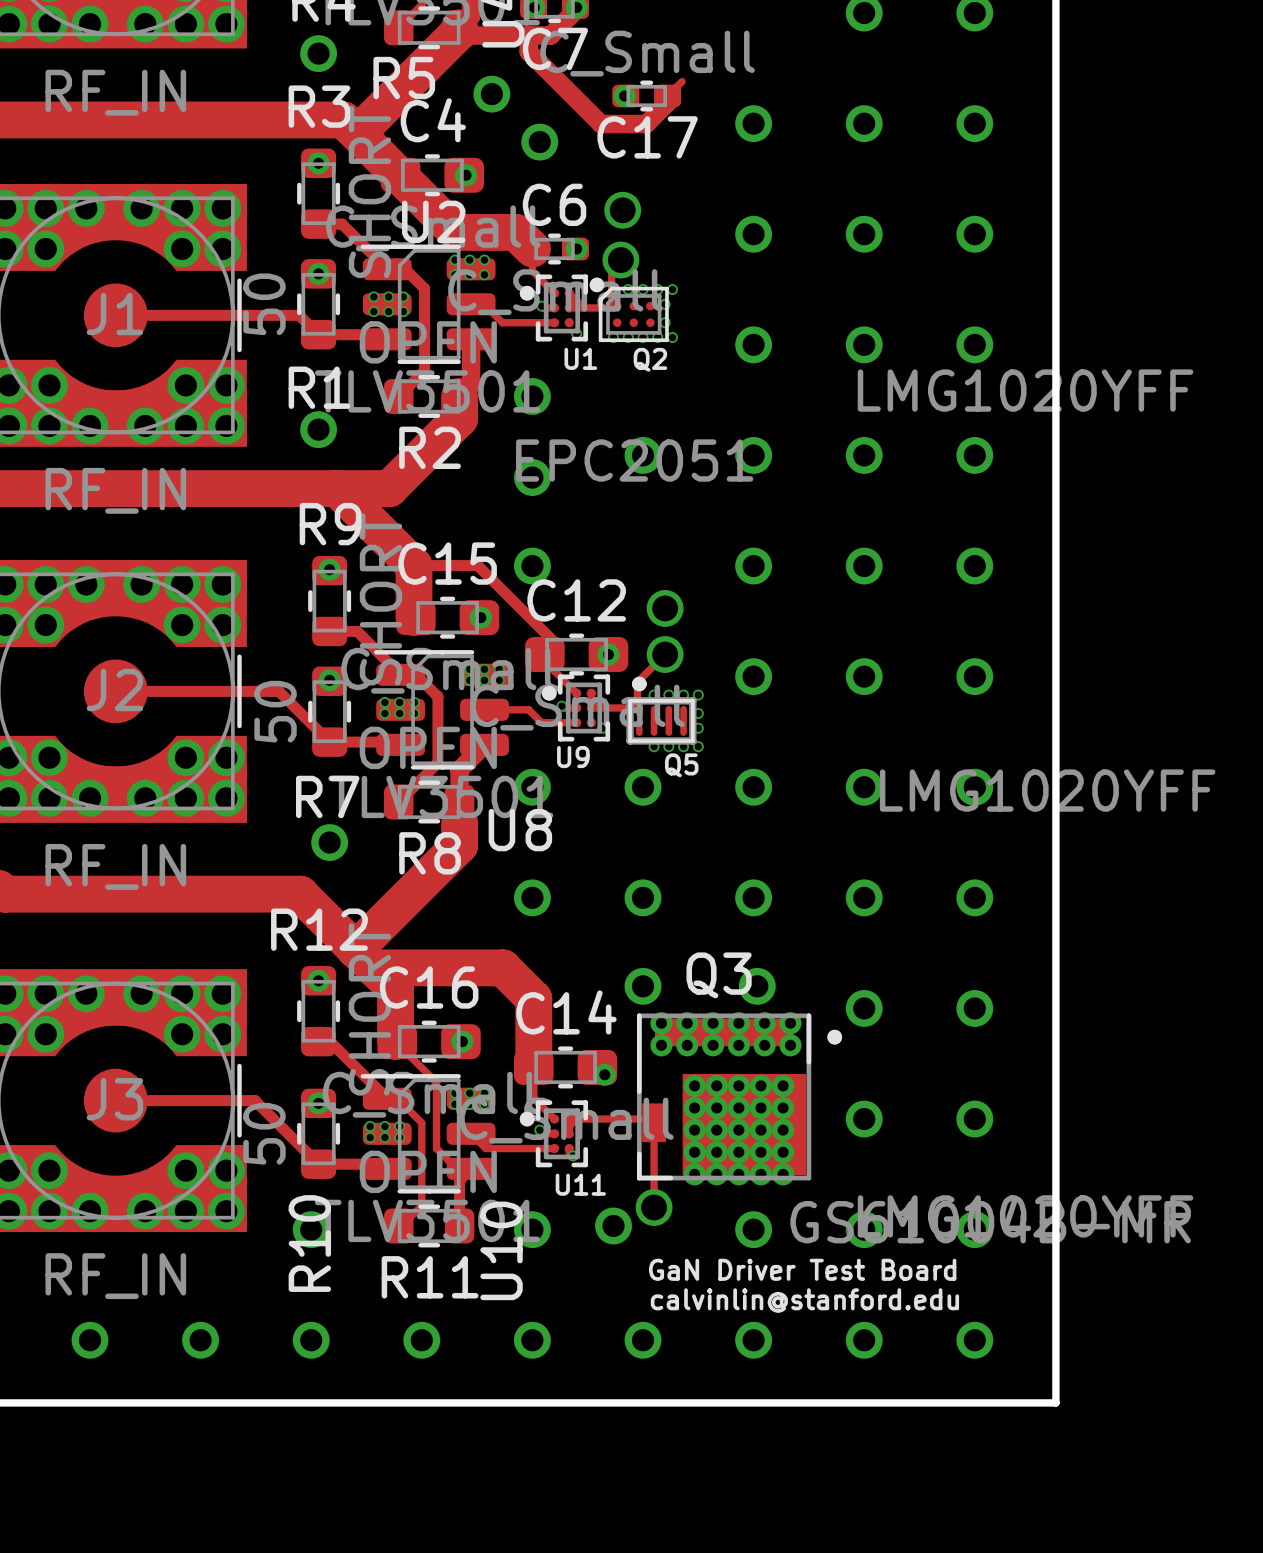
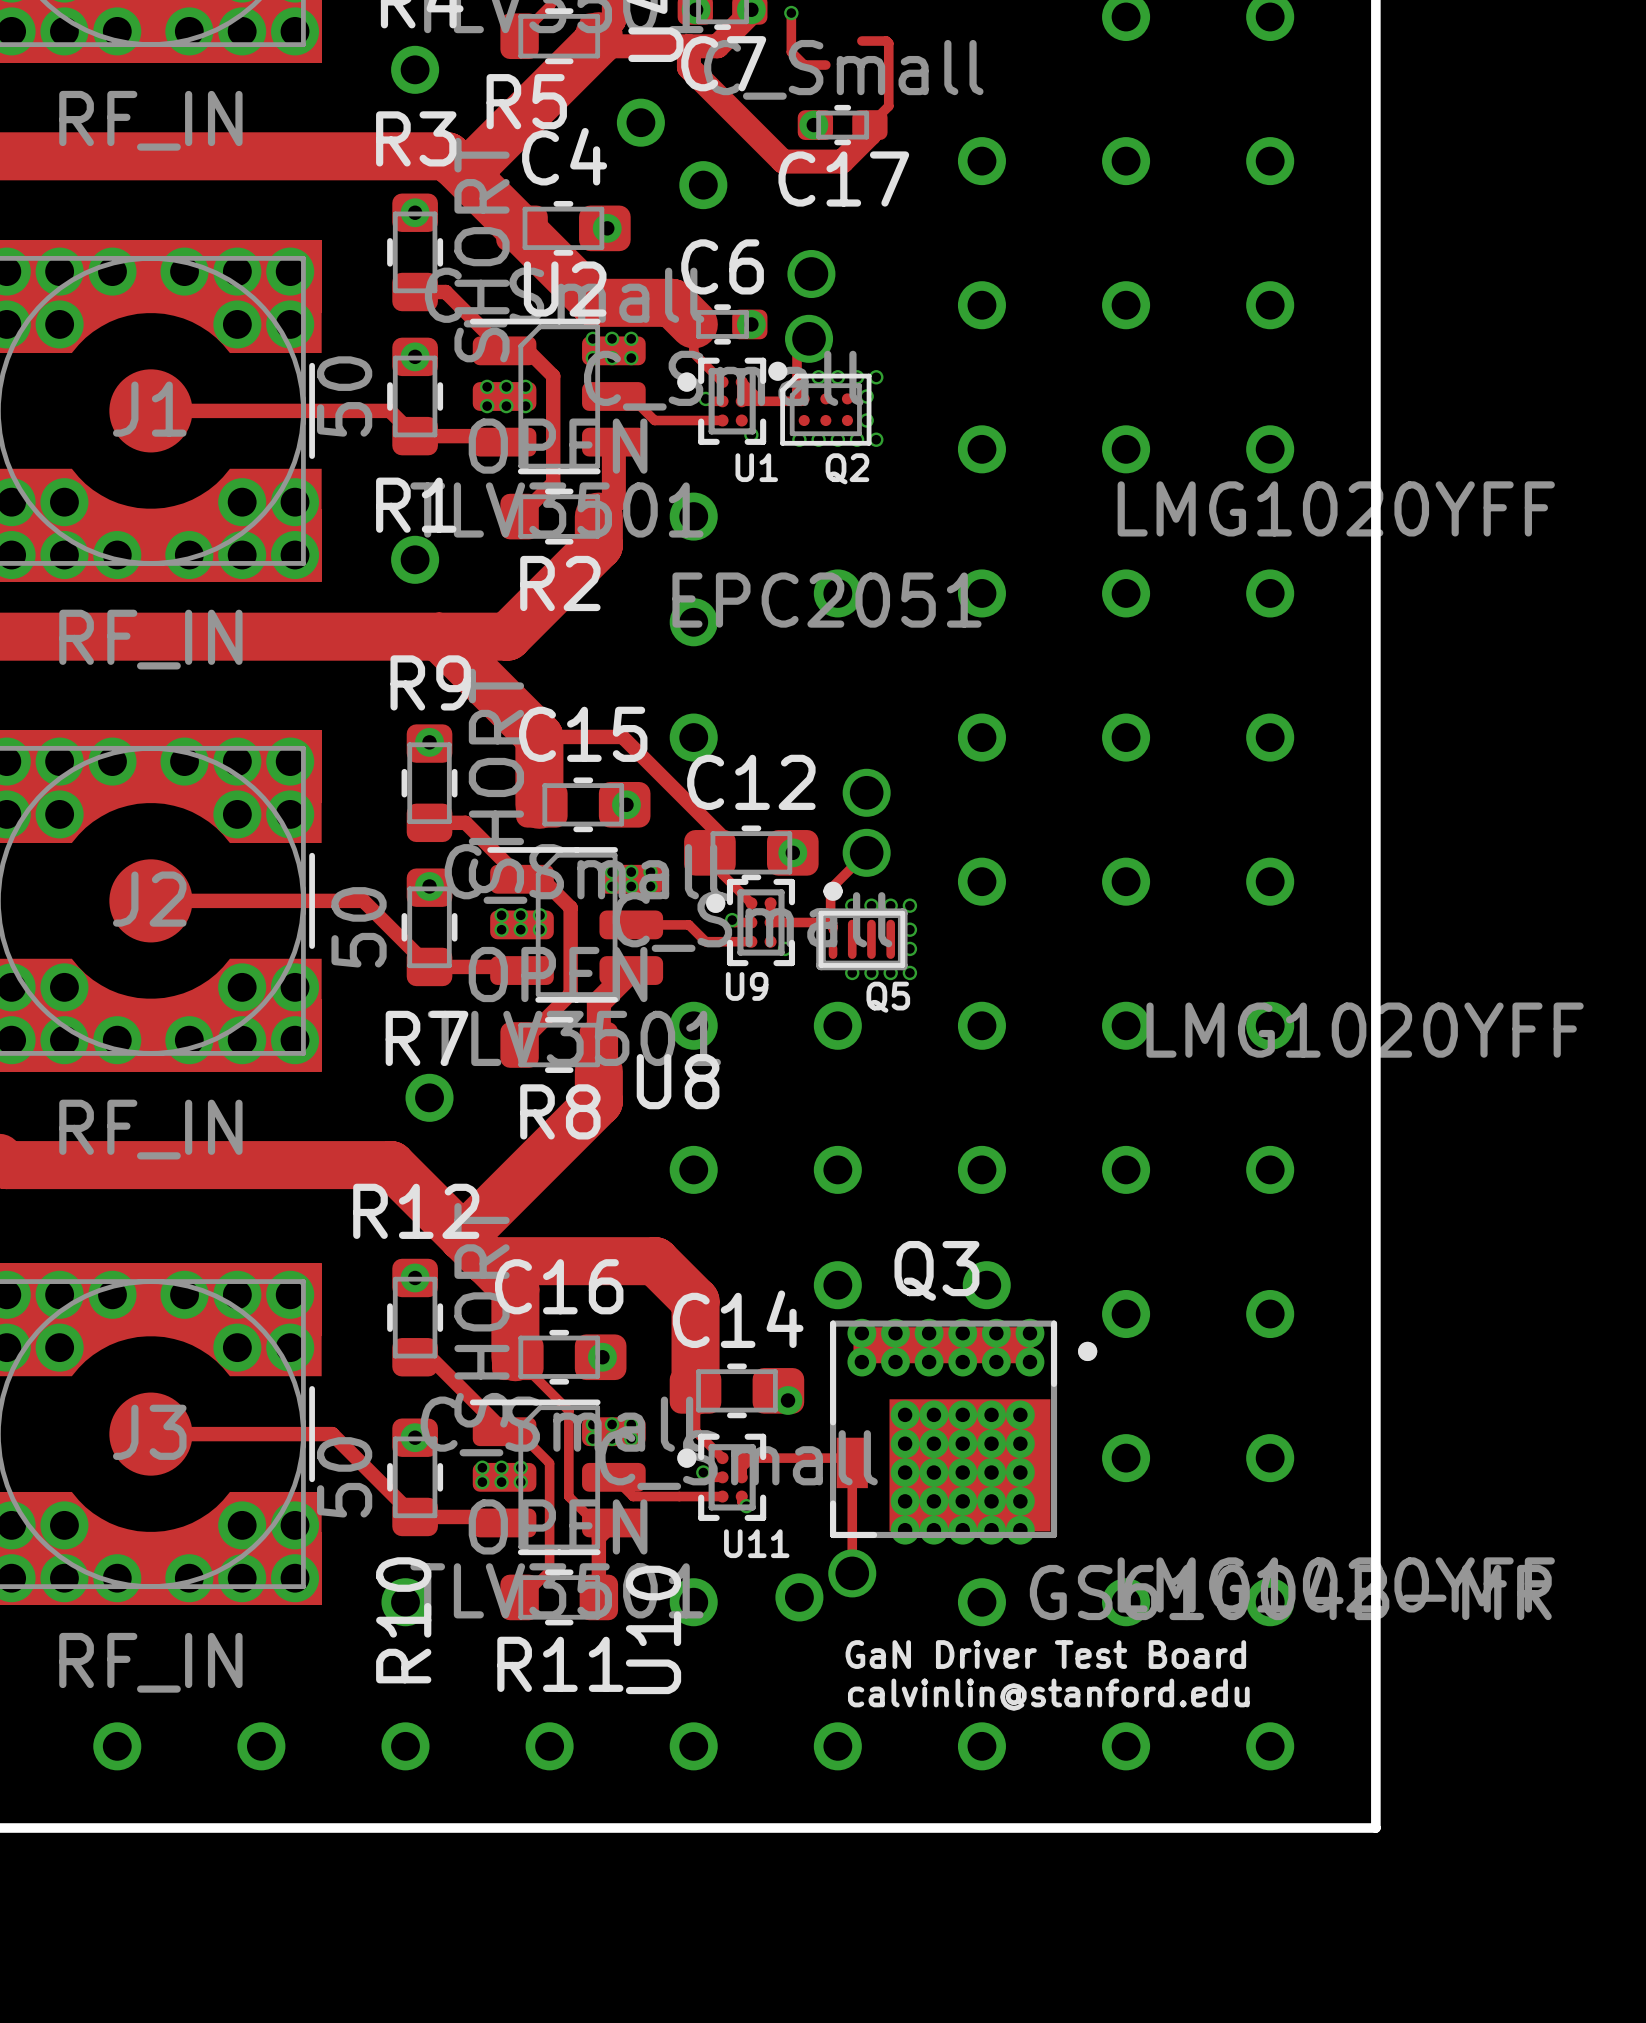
top track: none -> (791, 13) (791, 52) (804, 65) (825, 65)
via: none -> (791, 13)
top track: none -> (861, 41) (886, 41) (888, 43) (888, 106)

